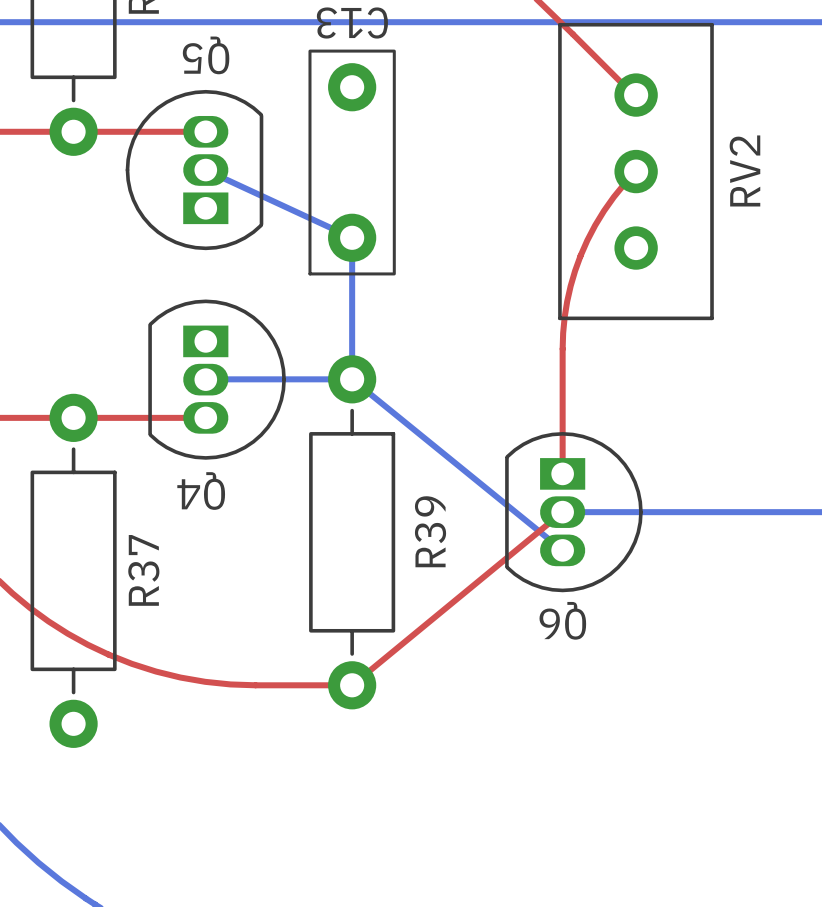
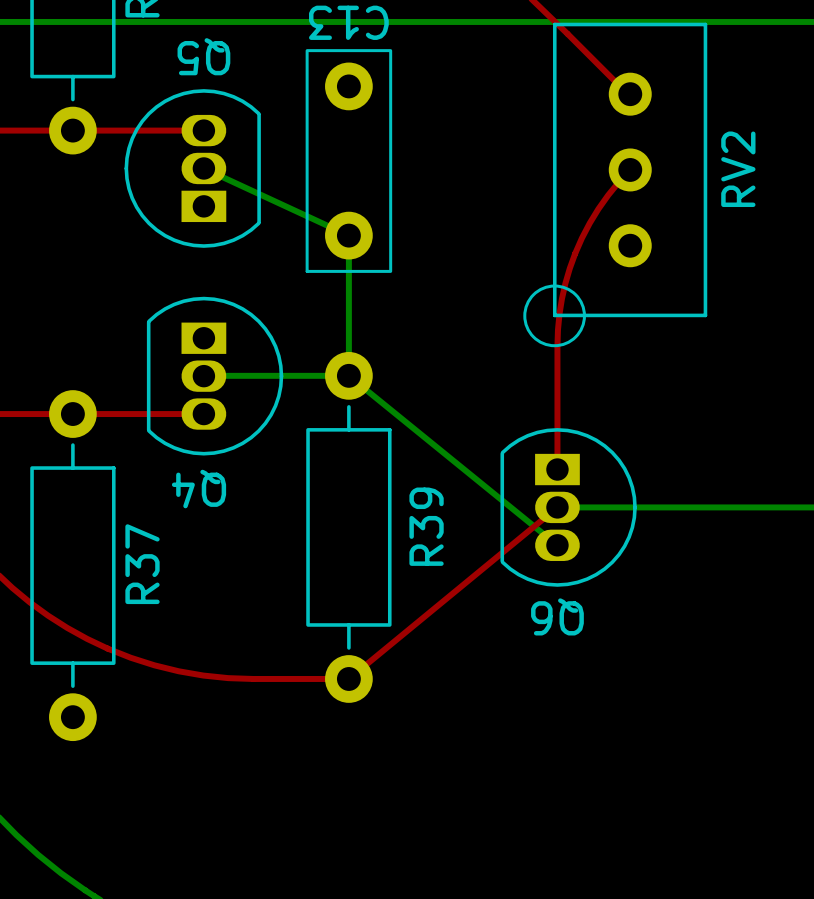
drawing: none -> [523, 284, 586, 348]

